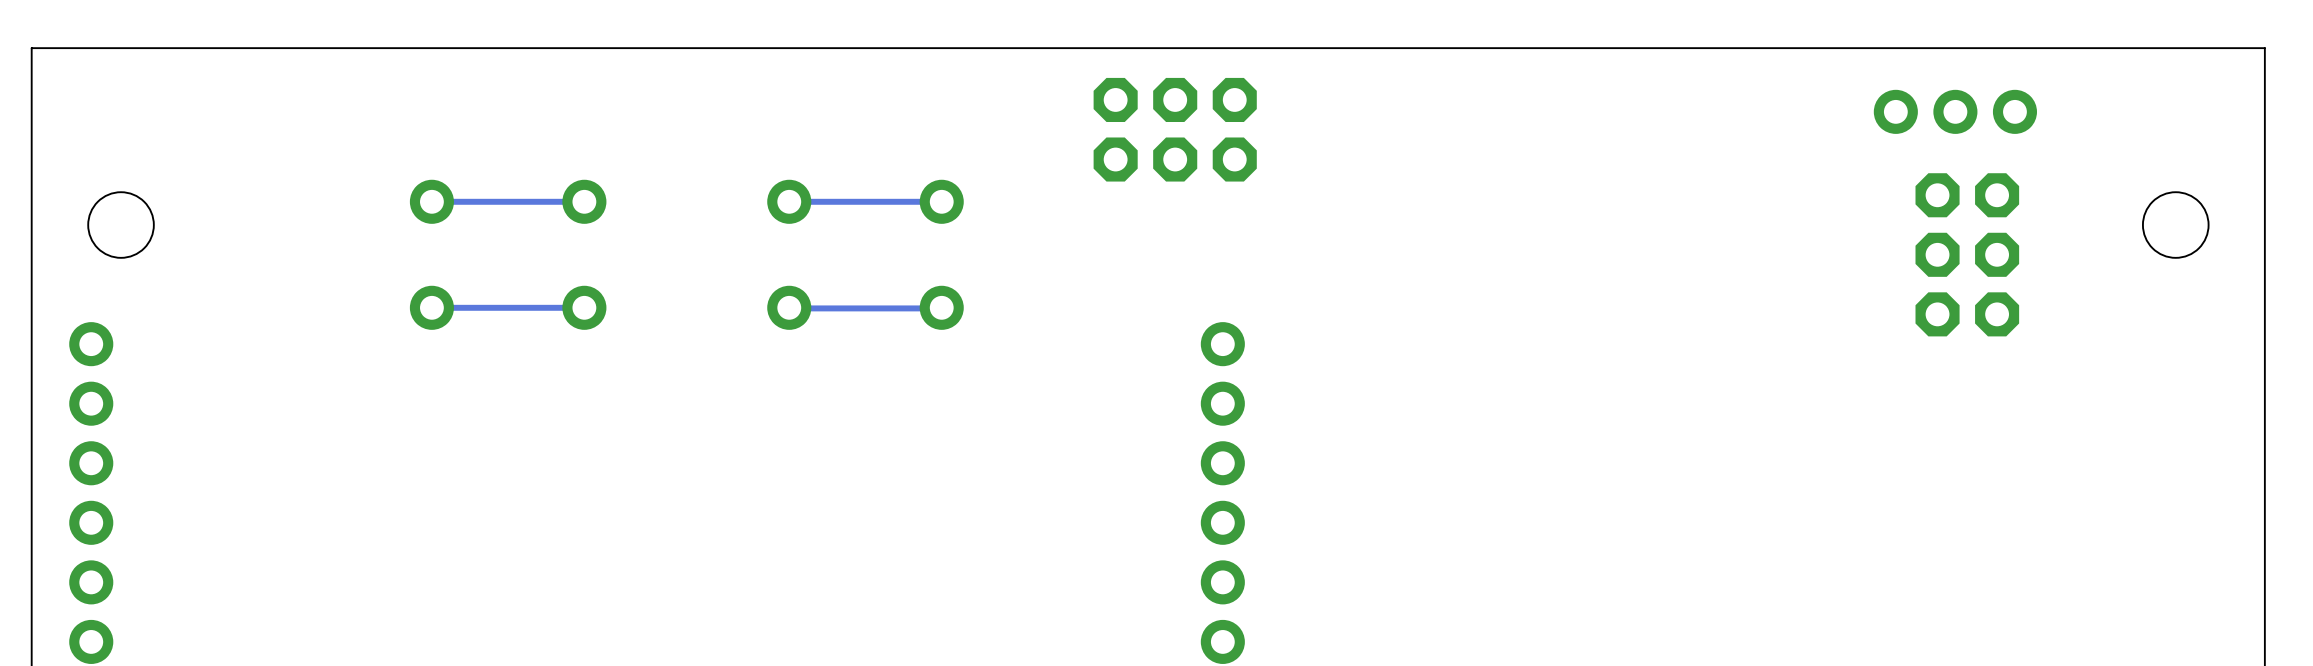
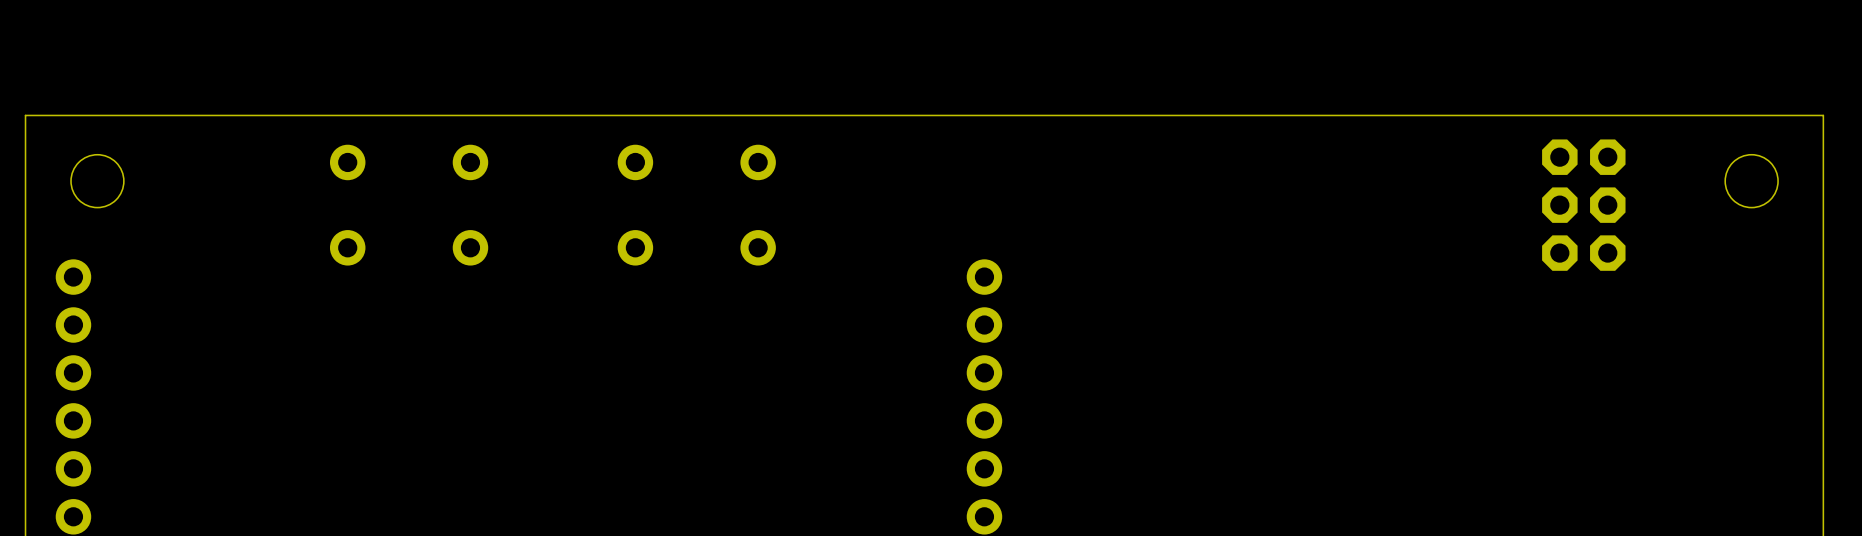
part: (1955, 111) -> none
part: (1175, 129) -> none
board edge: (2264, 143) (2264, 48) (31, 48) (31, 143) -> (1823, 115) (25, 115)
track: (584, 201) (431, 201) -> none
track: (941, 201) (789, 201) -> none
track: (584, 307) (431, 307) -> none
track: (941, 307) (789, 307) -> none

